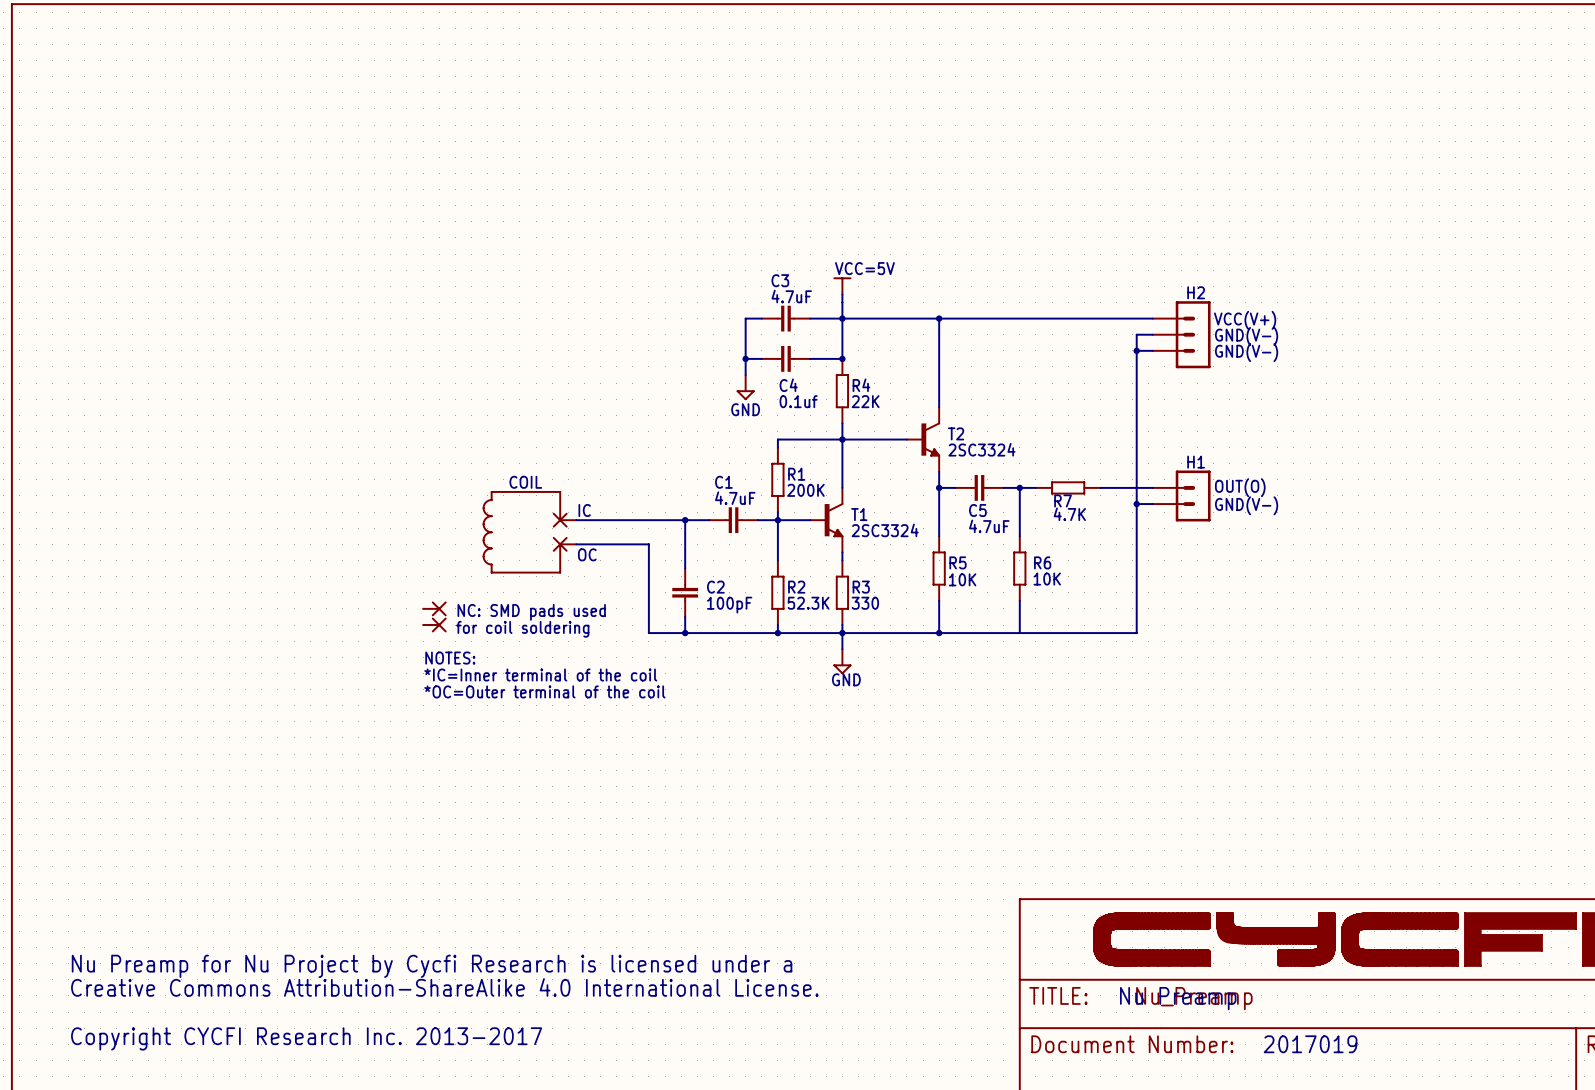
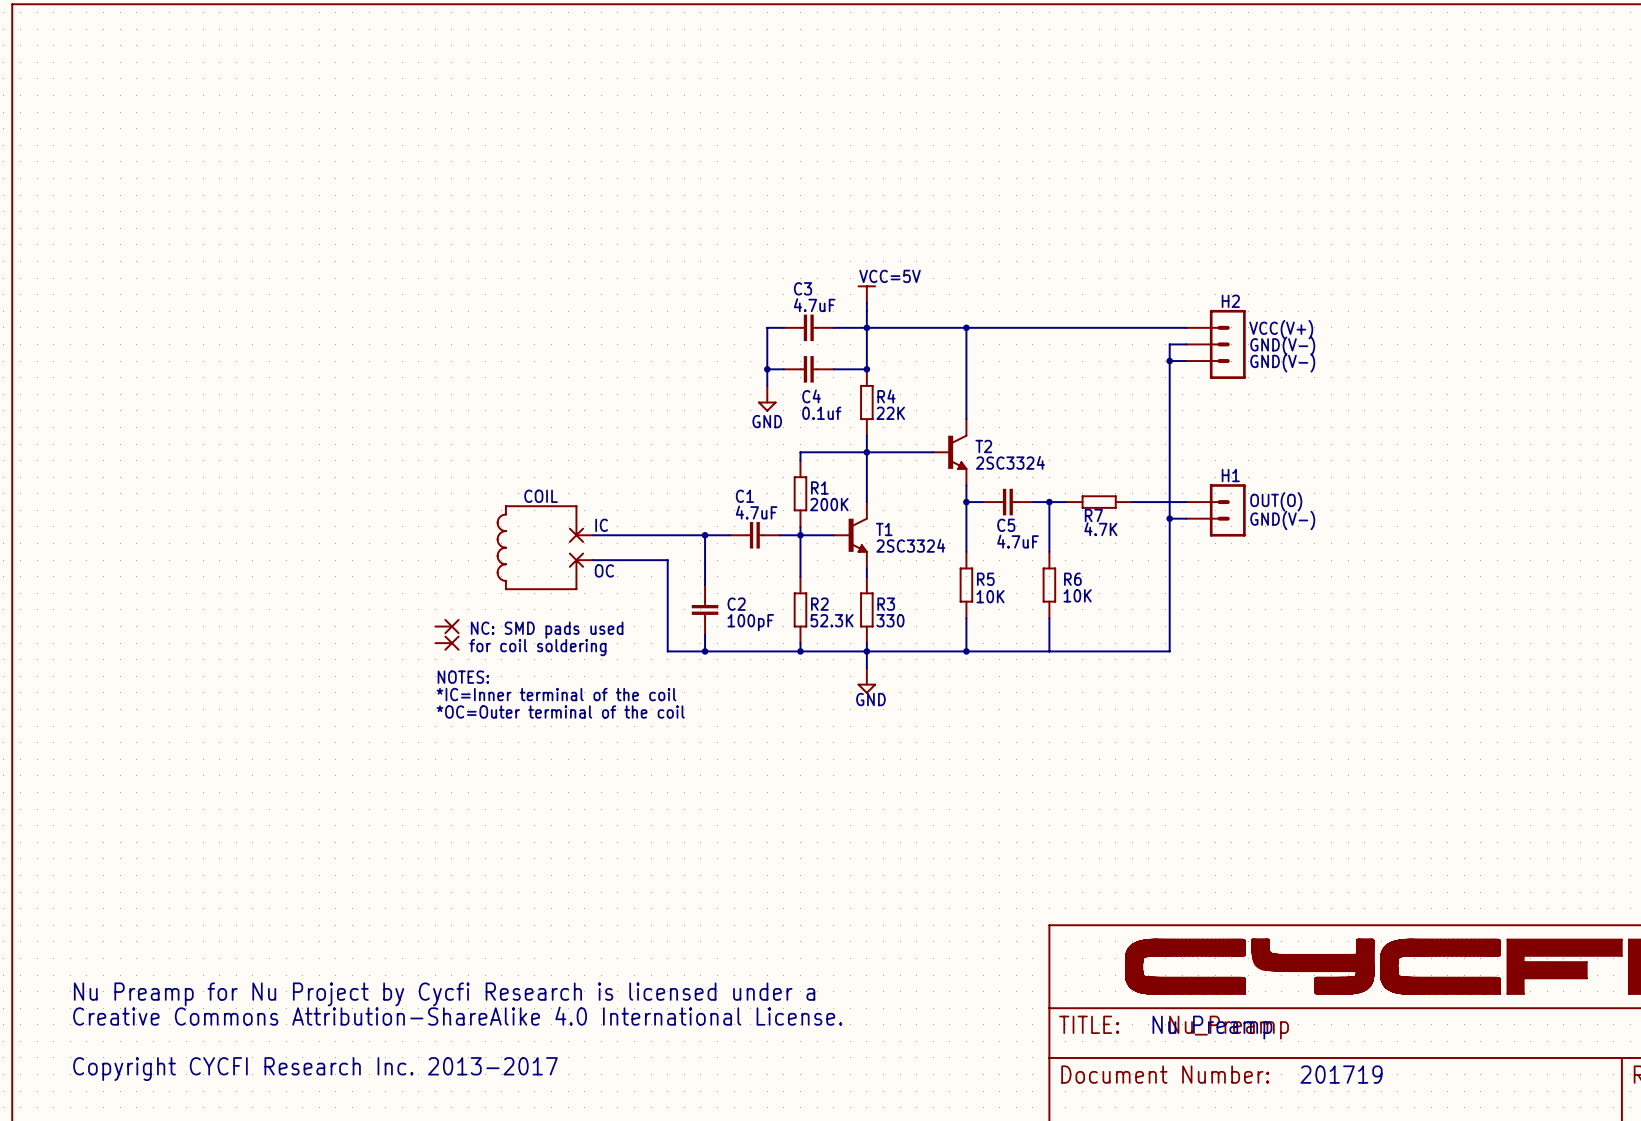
text: 2017019 (1310, 1044) -> 201719 (1341, 1074)

